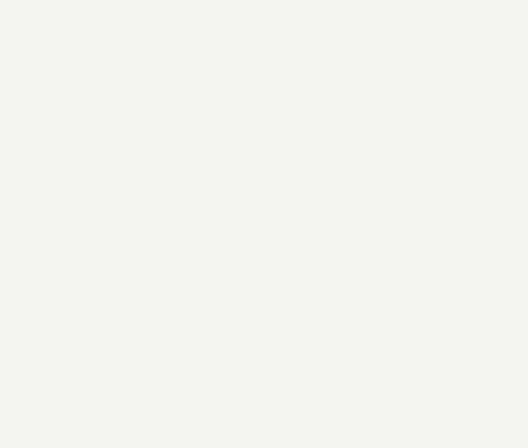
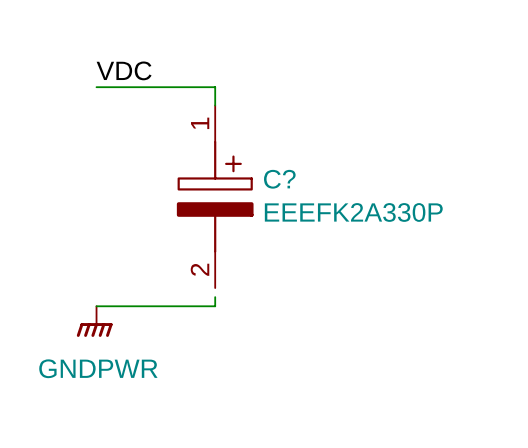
label: none -> VDC (124, 70)
wire: none -> (96, 87) (215, 87) (215, 105)
C?: none -> EEEFK2A330P (215, 196)
wire: none -> (215, 297) (215, 306) (96, 306)
power symbol: none -> GNDPWR (94, 321)

